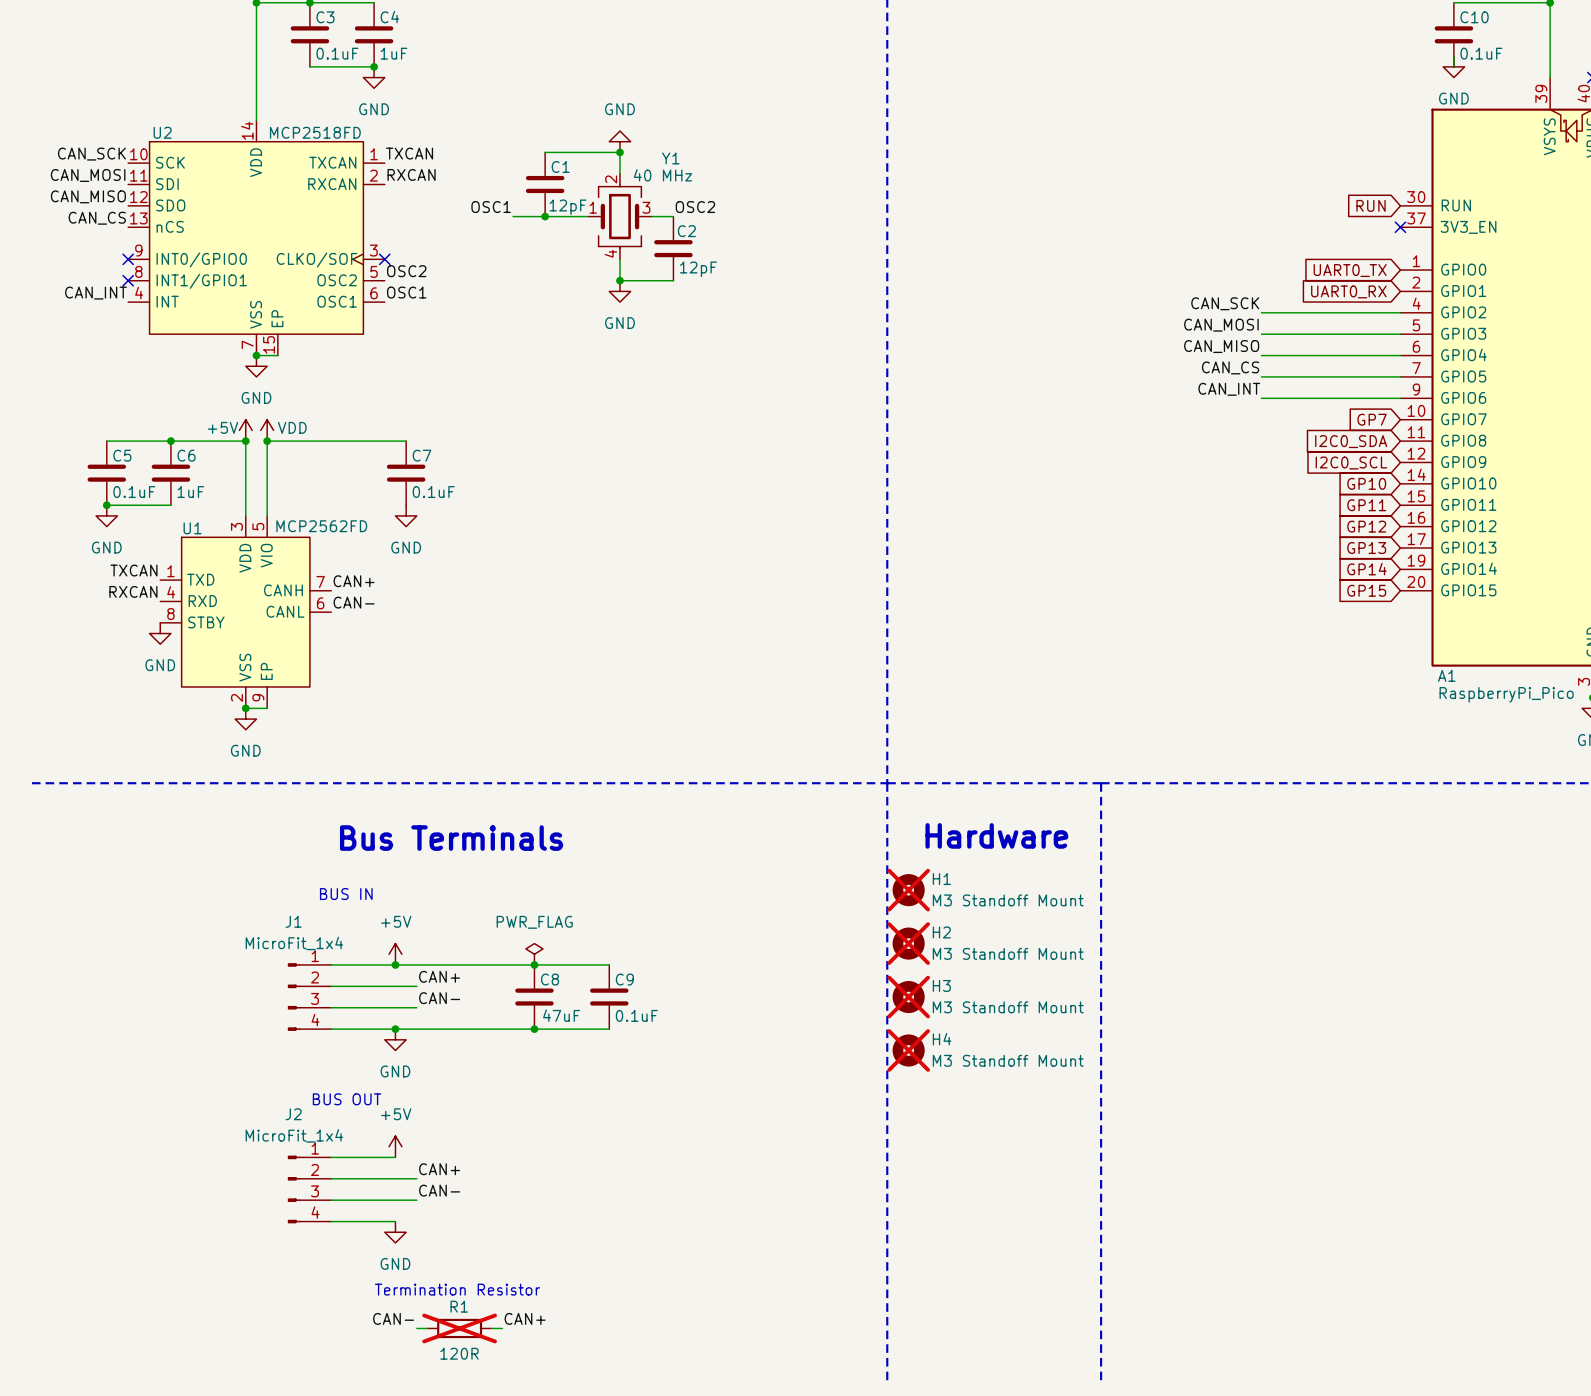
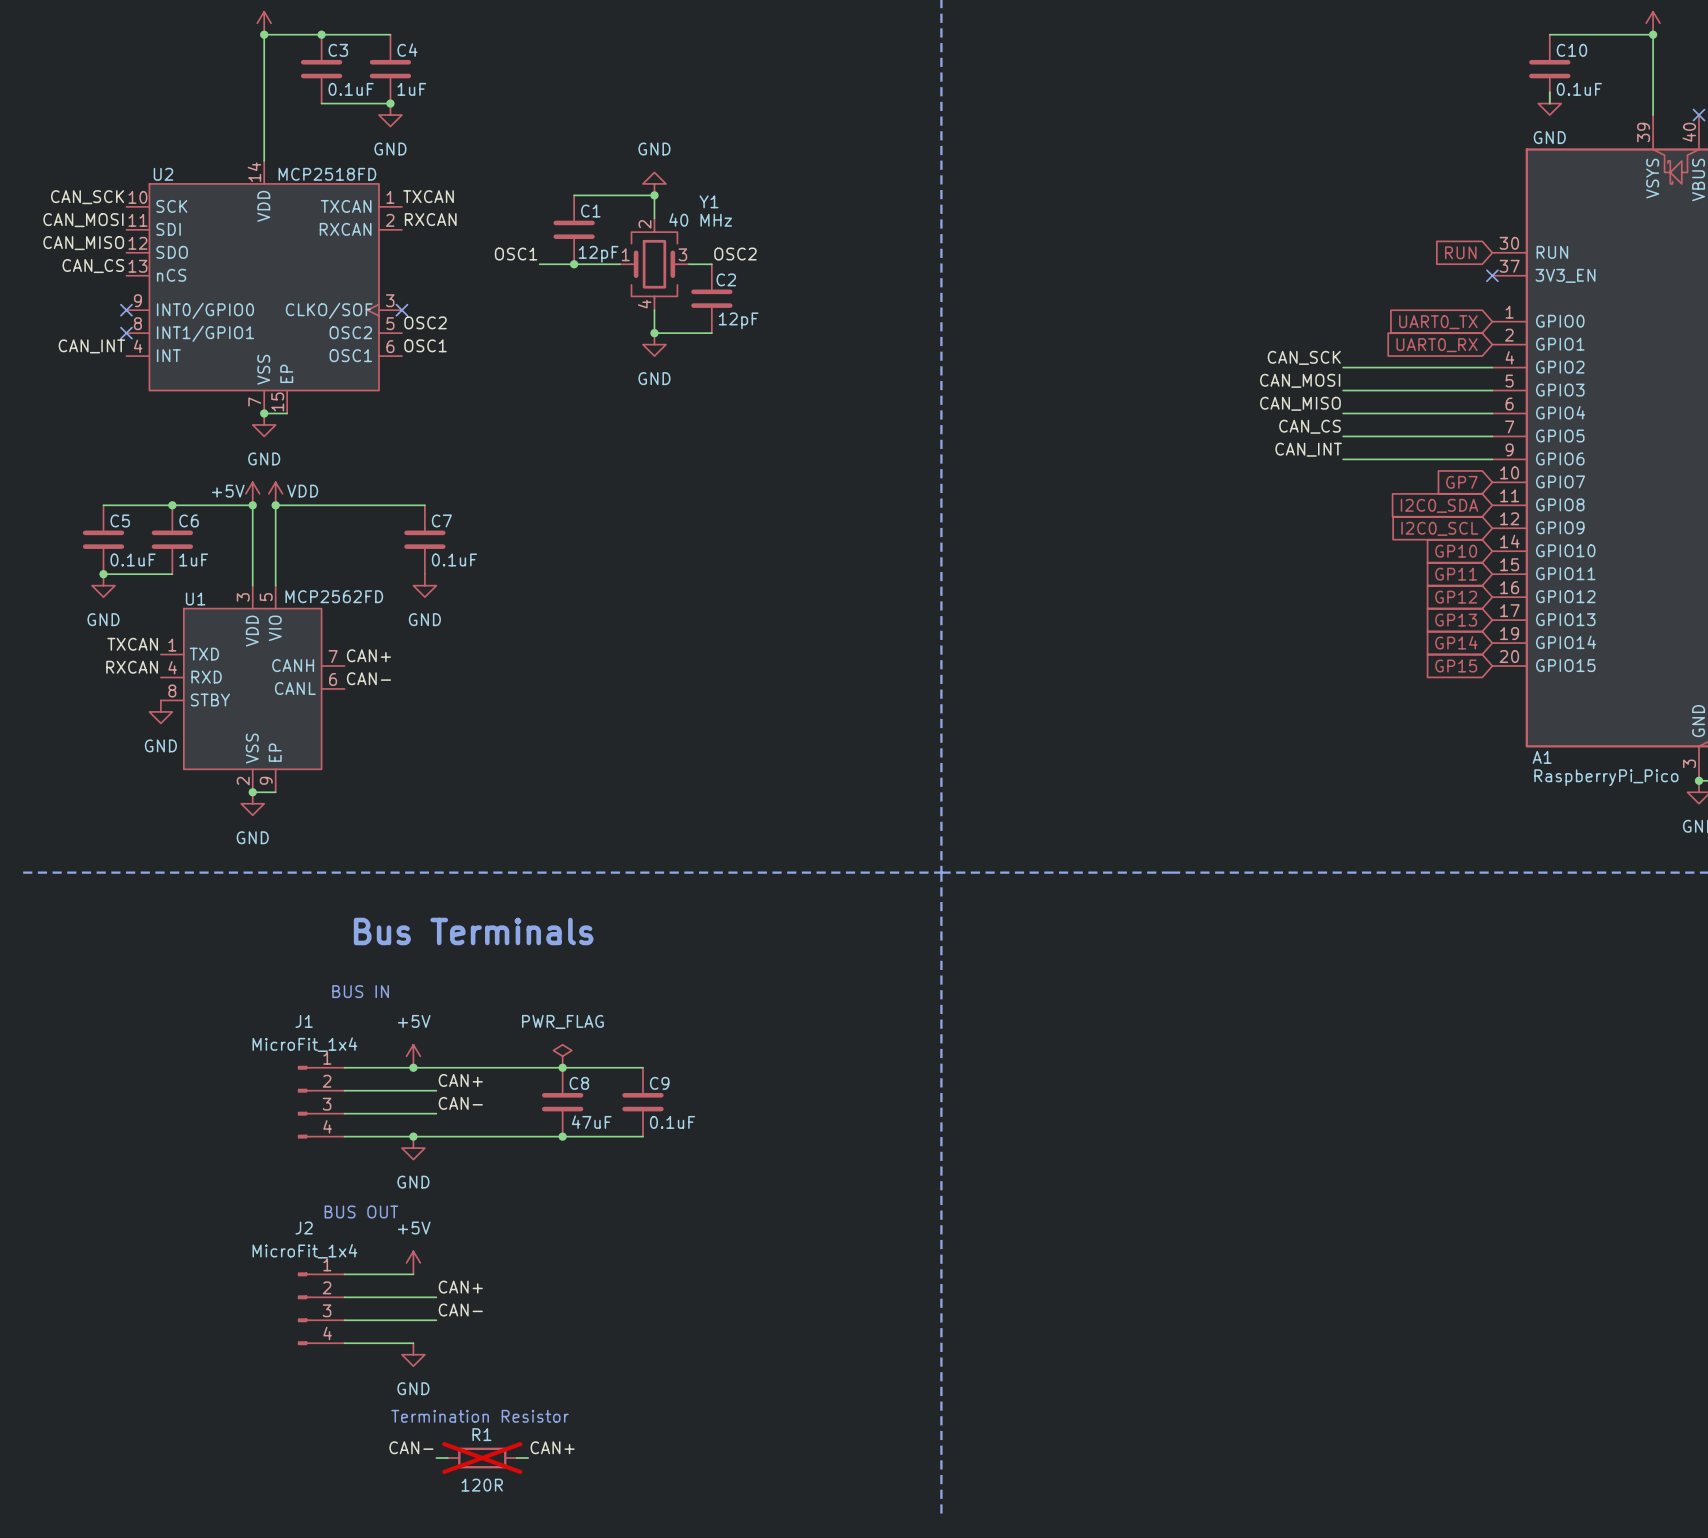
line: (1101, 783) (1101, 1381) -> none
text: Hardware (996, 835) -> none
H1: M3 Standoff Mount (908, 890) -> none
H2: M3 Standoff Mount (908, 943) -> none
H3: M3 Standoff Mount (908, 997) -> none
H4: M3 Standoff Mount (908, 1050) -> none

